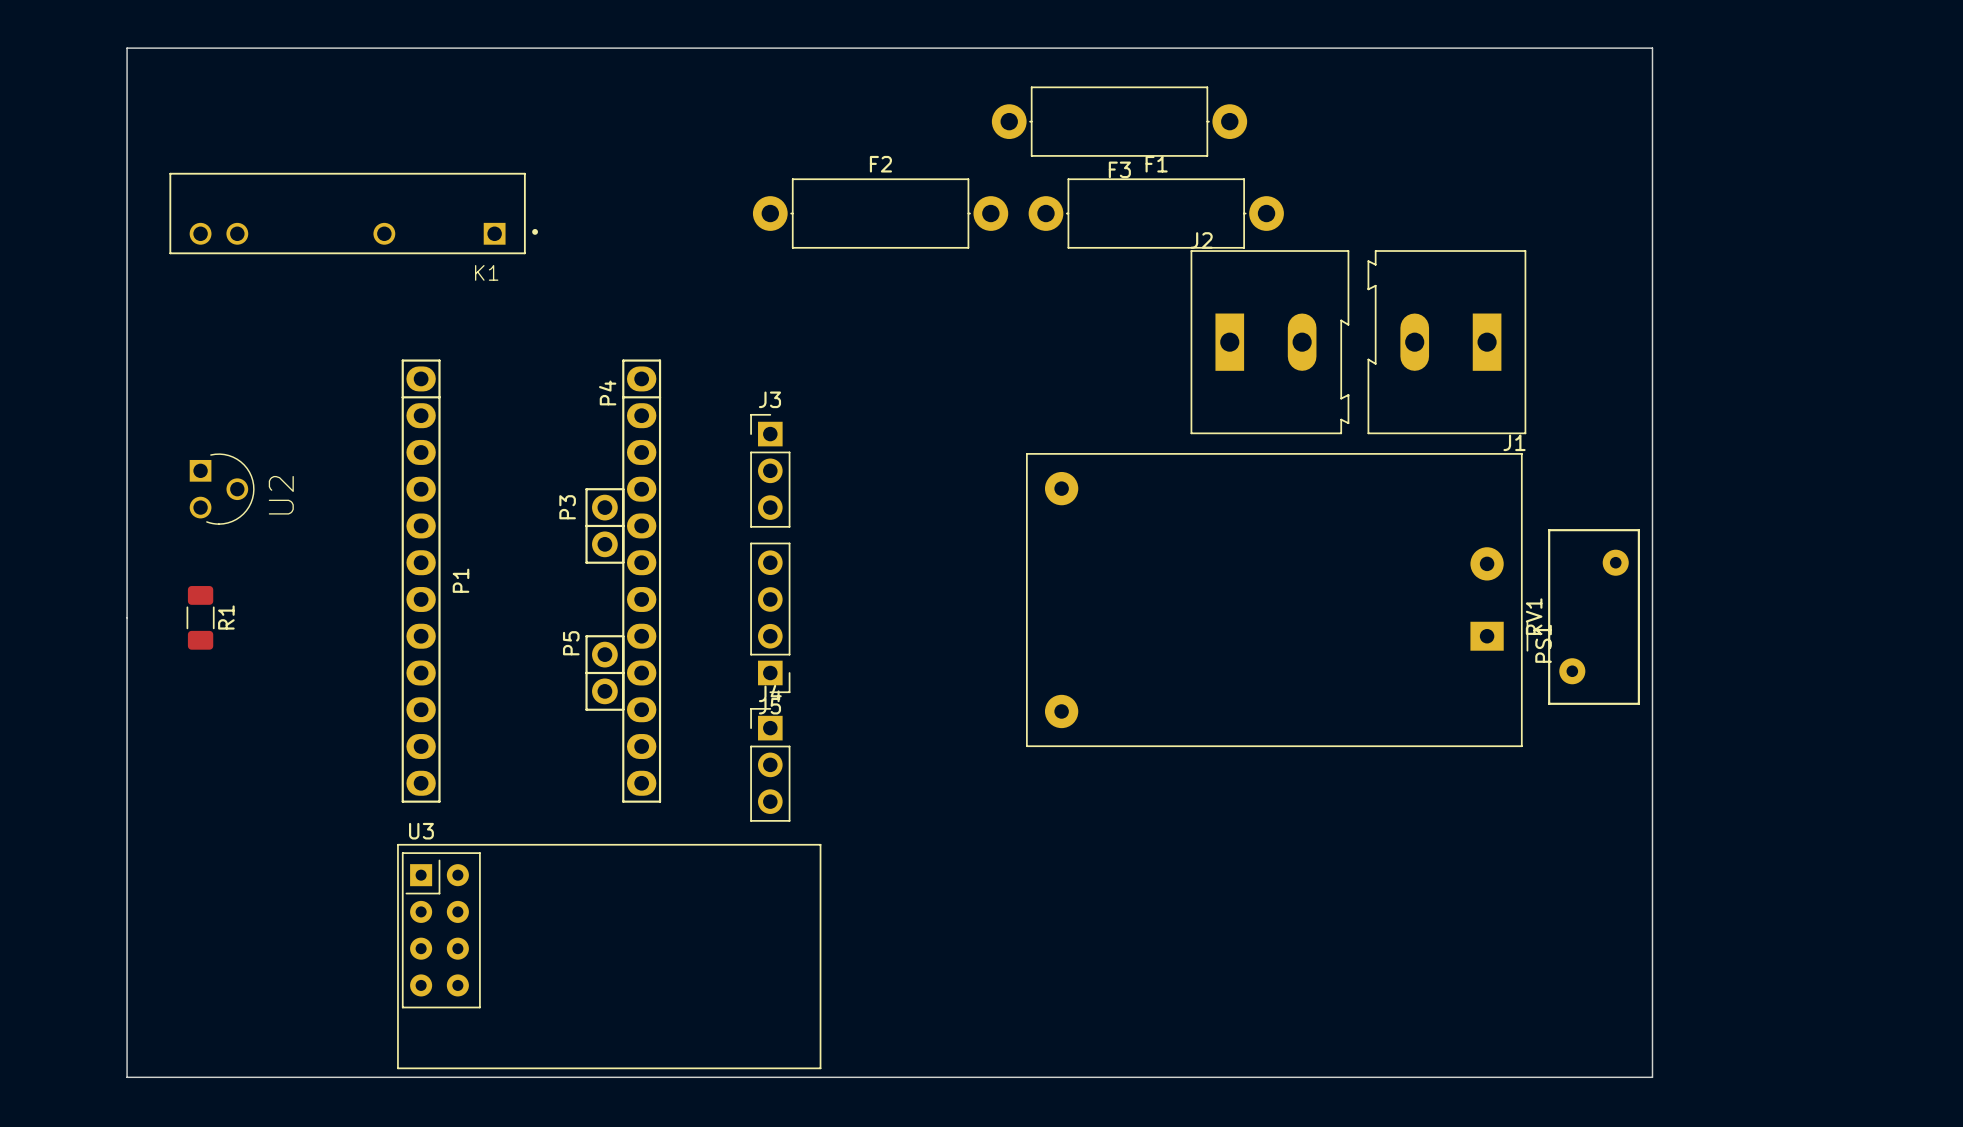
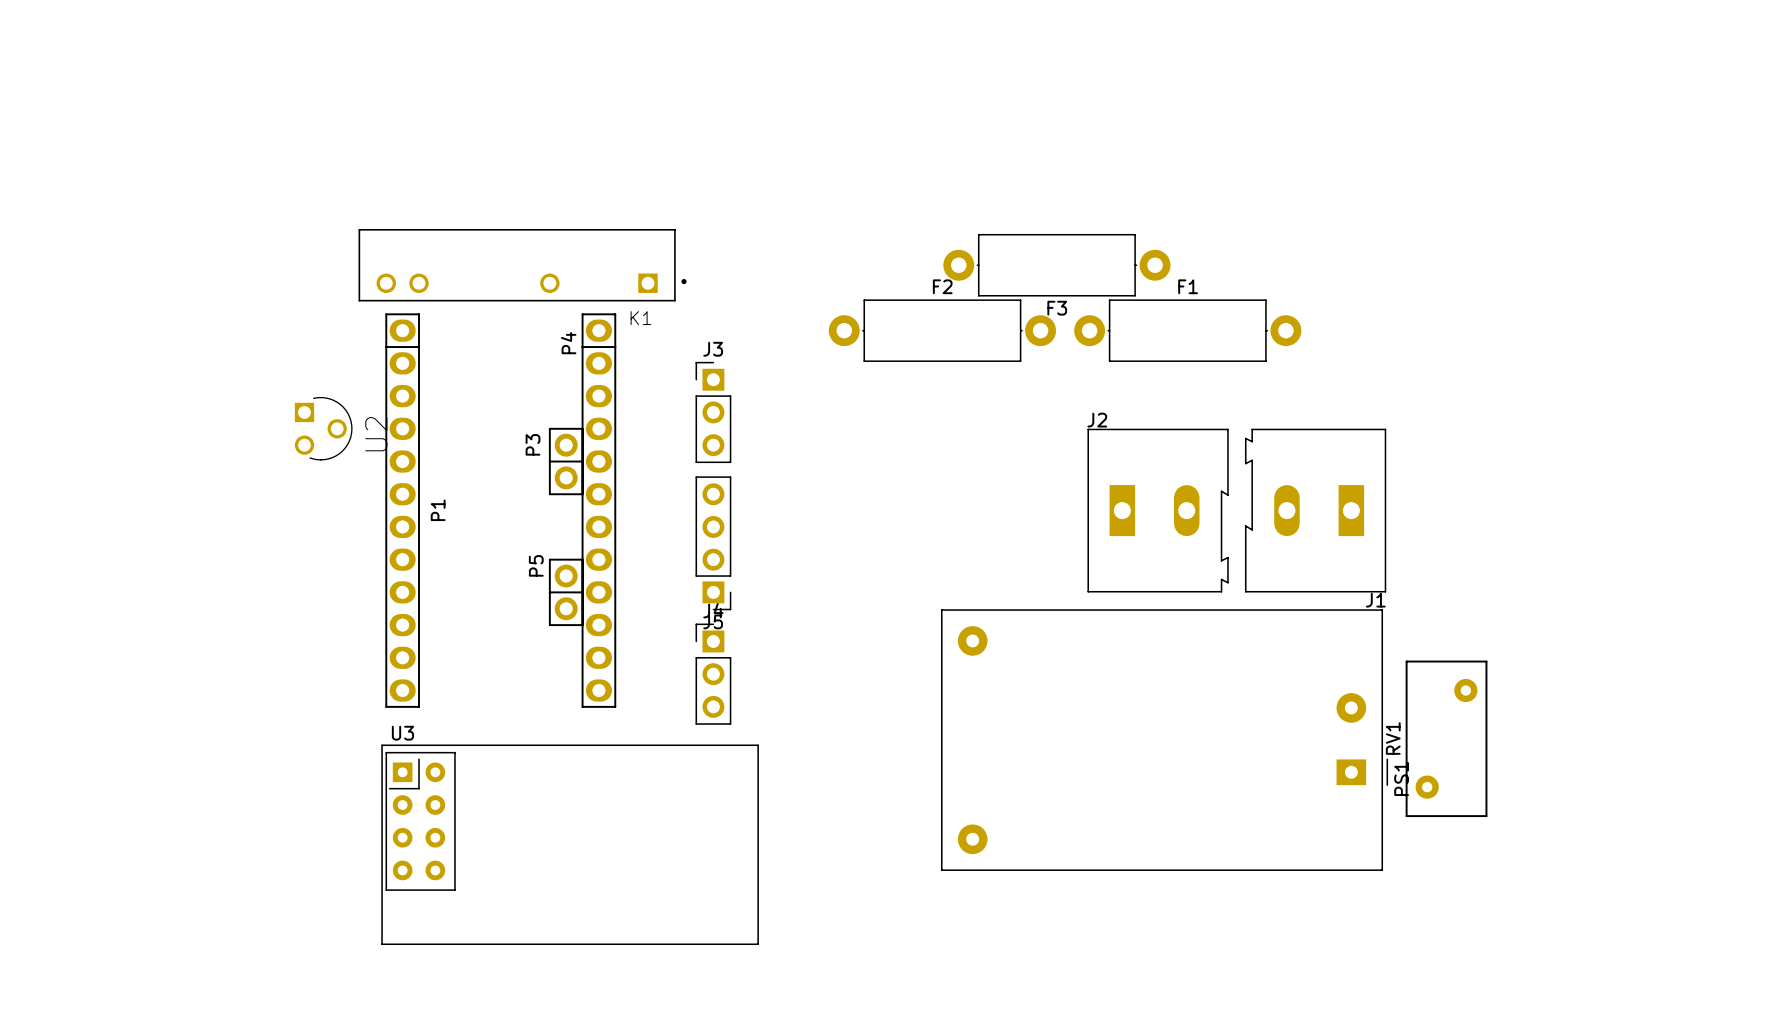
board edge: (127, 48) (127, 1077) (1652, 1077) (1652, 48) (127, 48) -> none
F3 position: (1119, 121) -> (1056, 265)
K1 position: (353, 213) -> (522, 265)
F2 position: (880, 213) -> (942, 330)
F1 position: (1156, 213) -> (1187, 330)
J2 position: (1269, 342) -> (1158, 510)
J1 position: (1446, 342) -> (1315, 510)
U2 position: (222, 489) -> (323, 428)
PS1 position: (1277, 600) -> (1164, 740)
RV1 position: (1594, 616) -> (1446, 738)
R1: (200, 617) -> none

